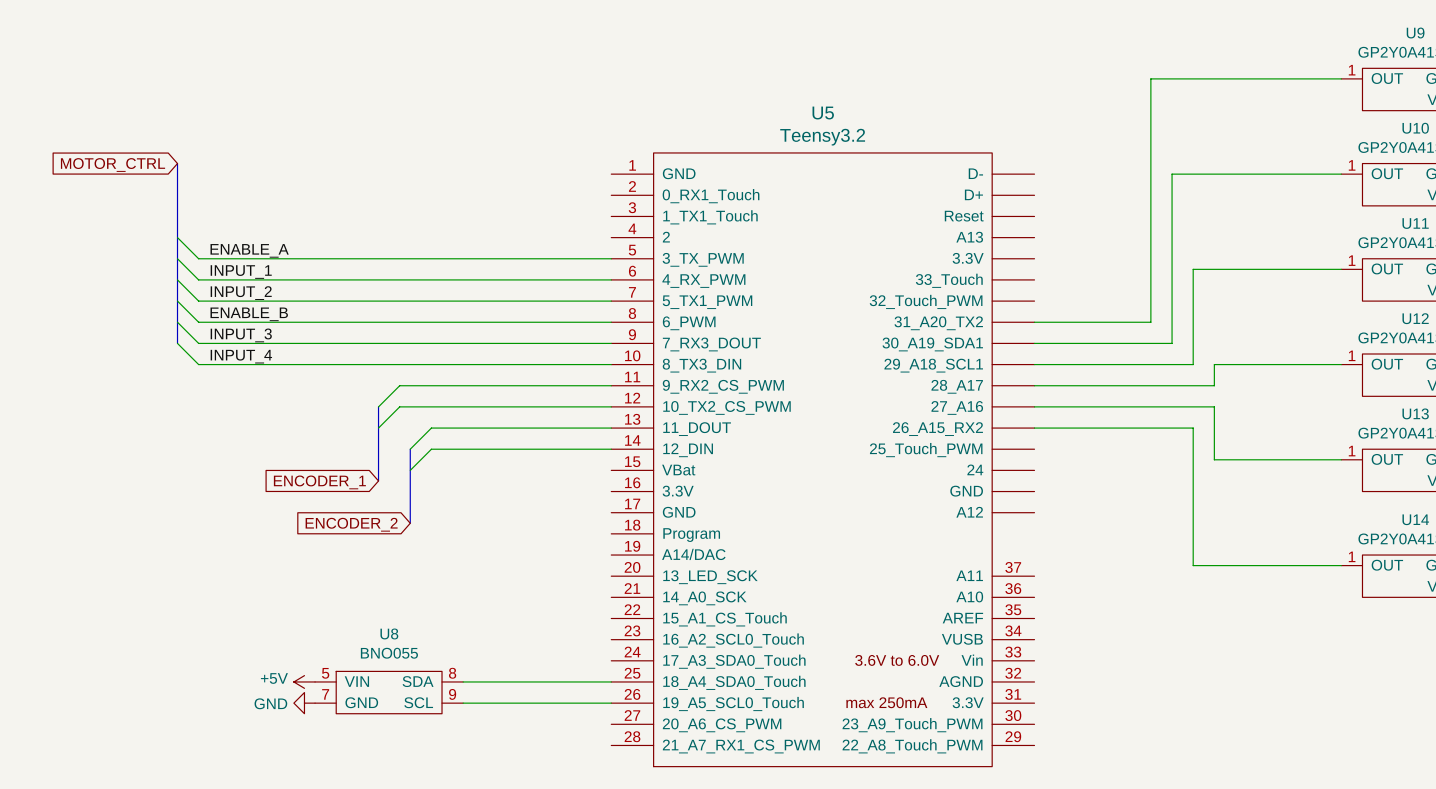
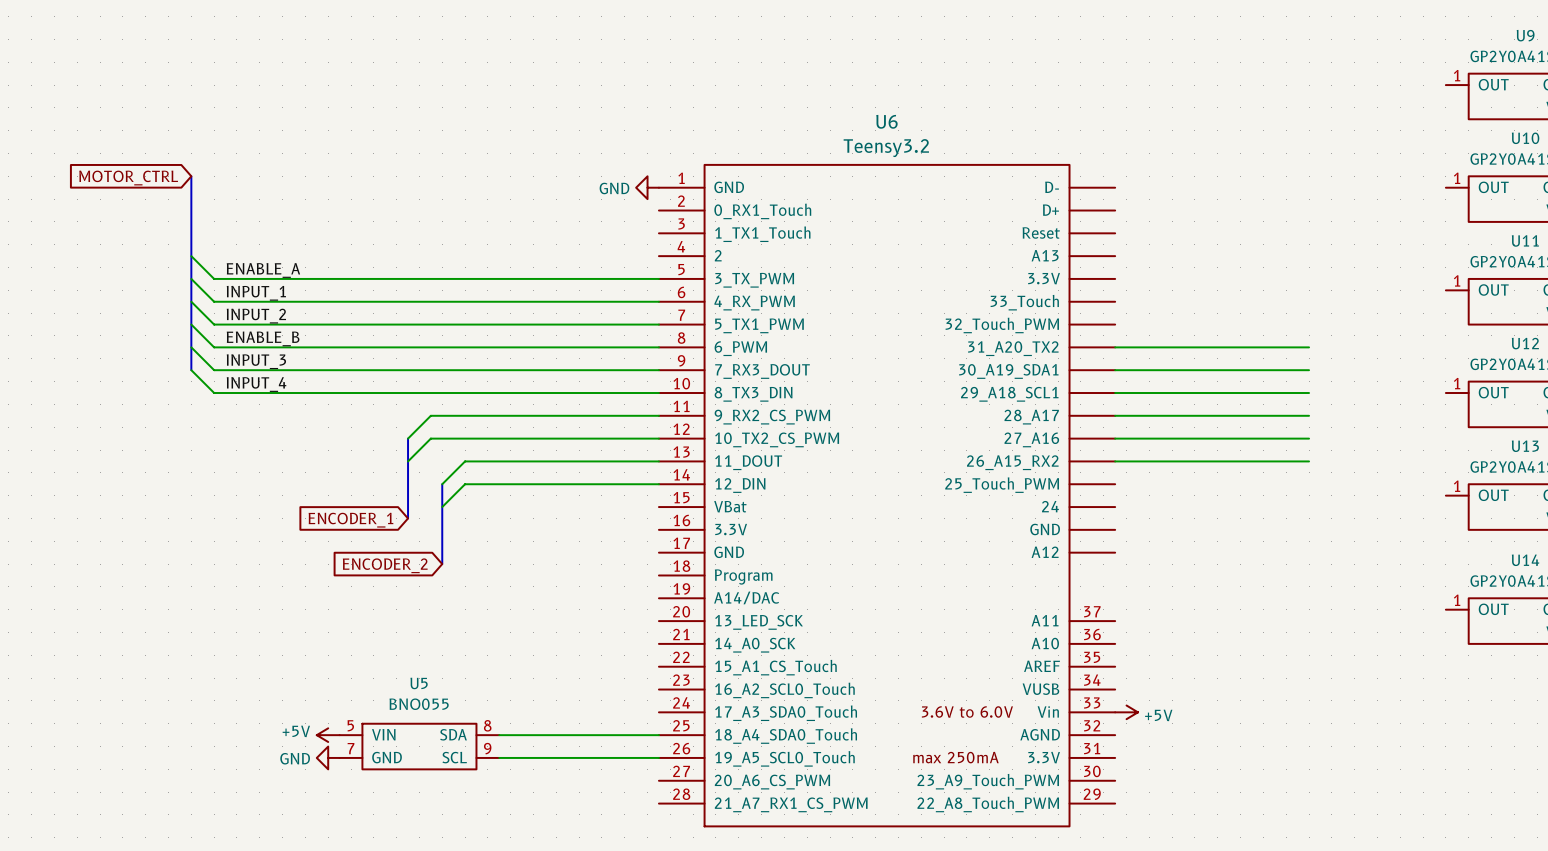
wire: (1341, 78) (1150, 78) (1150, 322) -> (1309, 347) (1240, 347)
U5 name: U5 (823, 113) -> U6 (886, 121)
power symbol: none -> GND (647, 187)
wire: (1341, 174) (1172, 174) (1172, 343) -> (1309, 370) (1263, 370)
wire: (1341, 269) (1193, 269) (1193, 364) -> (1309, 393) (1286, 393)
wire: (1341, 364) (1214, 364) (1214, 385) -> none
wire: (1214, 406) (1214, 459) (1341, 459) -> none
wire: (1193, 428) (1193, 565) (1341, 565) -> (1286, 461) (1309, 461)
U8 name: U8 (389, 633) -> U5 (419, 683)
power symbol: none -> +5V (1126, 712)

